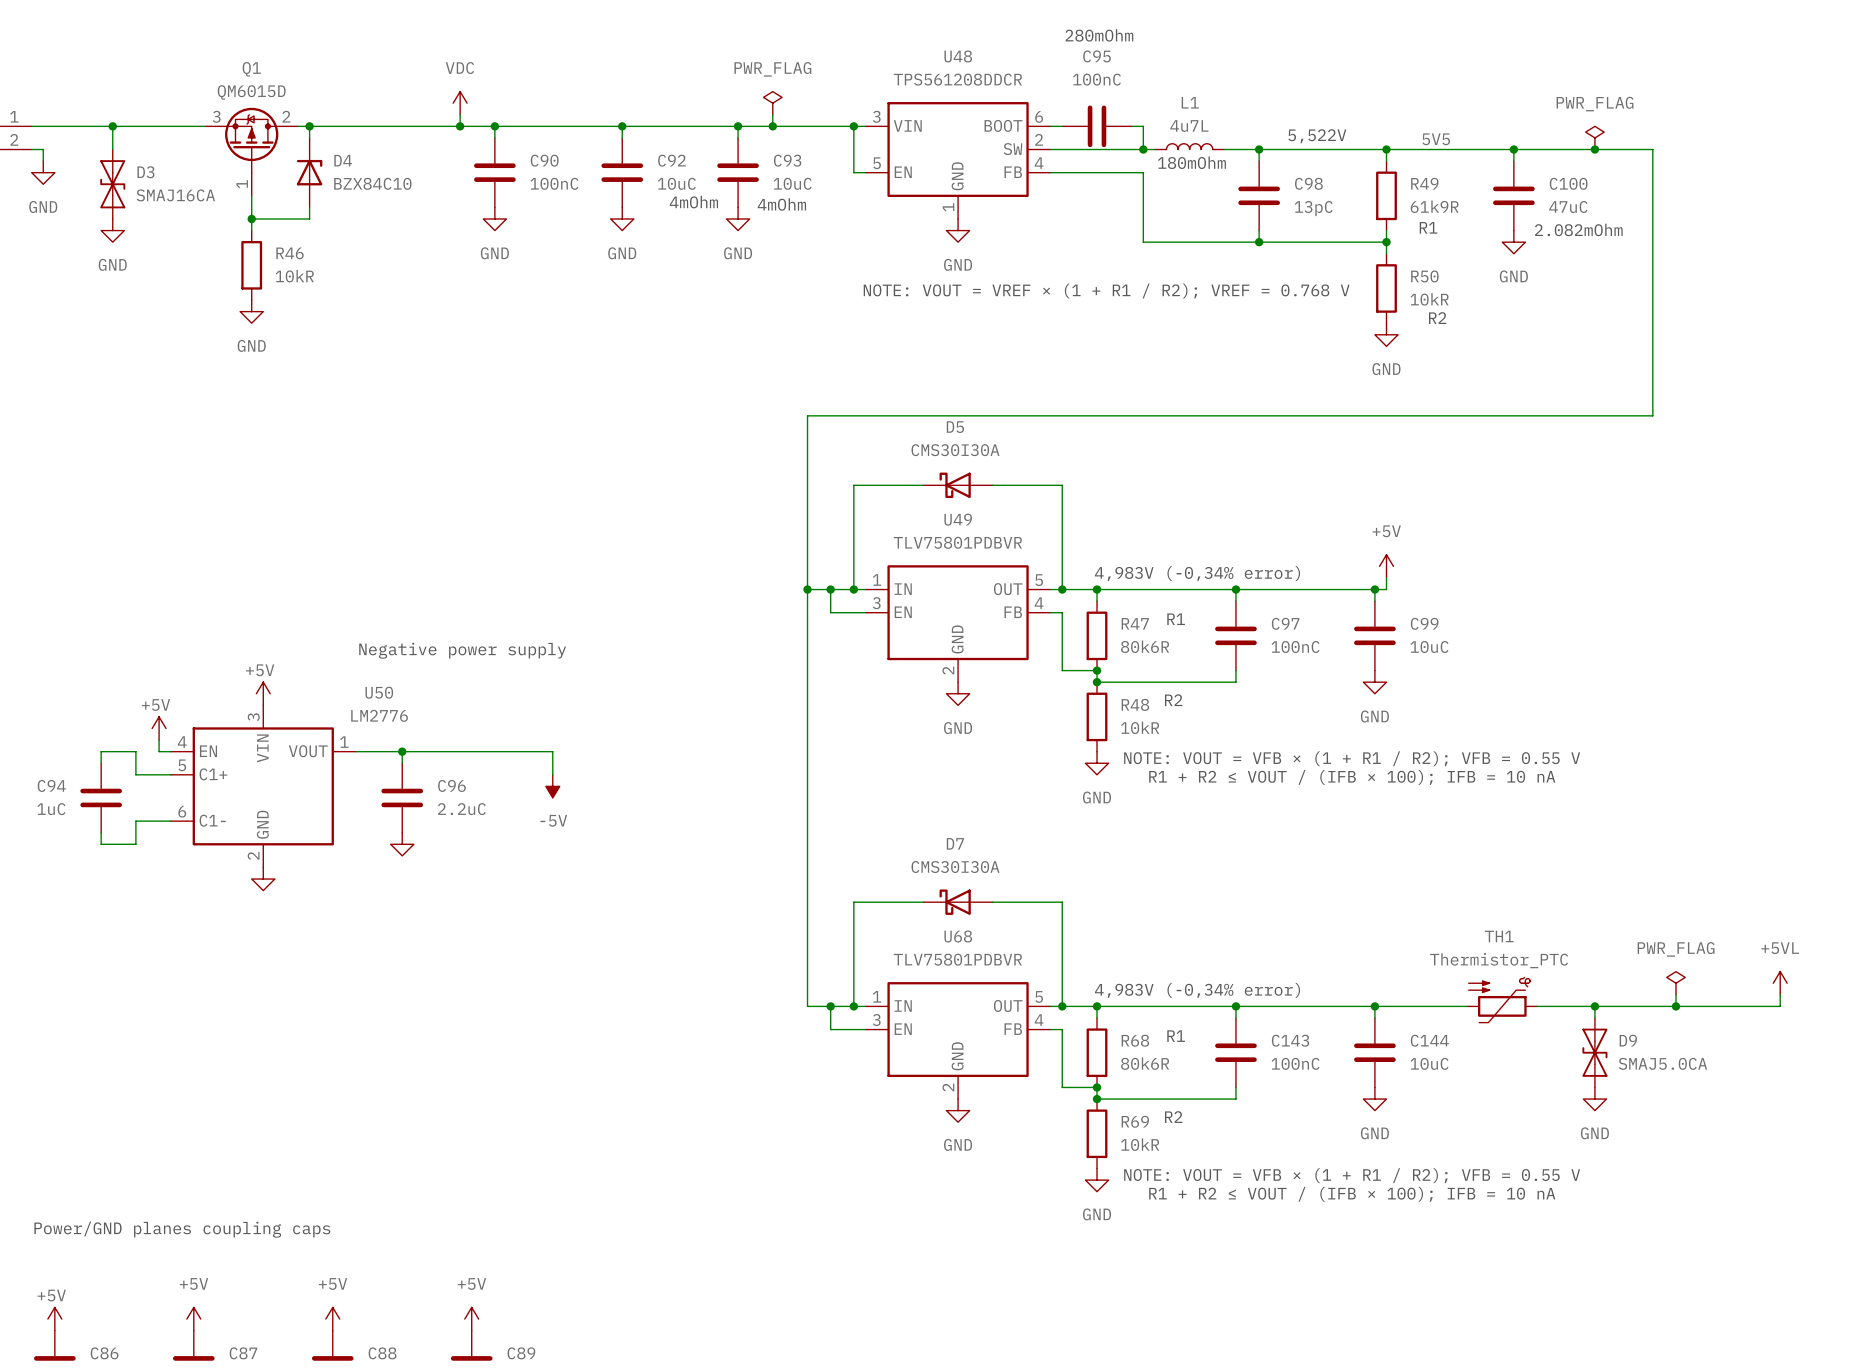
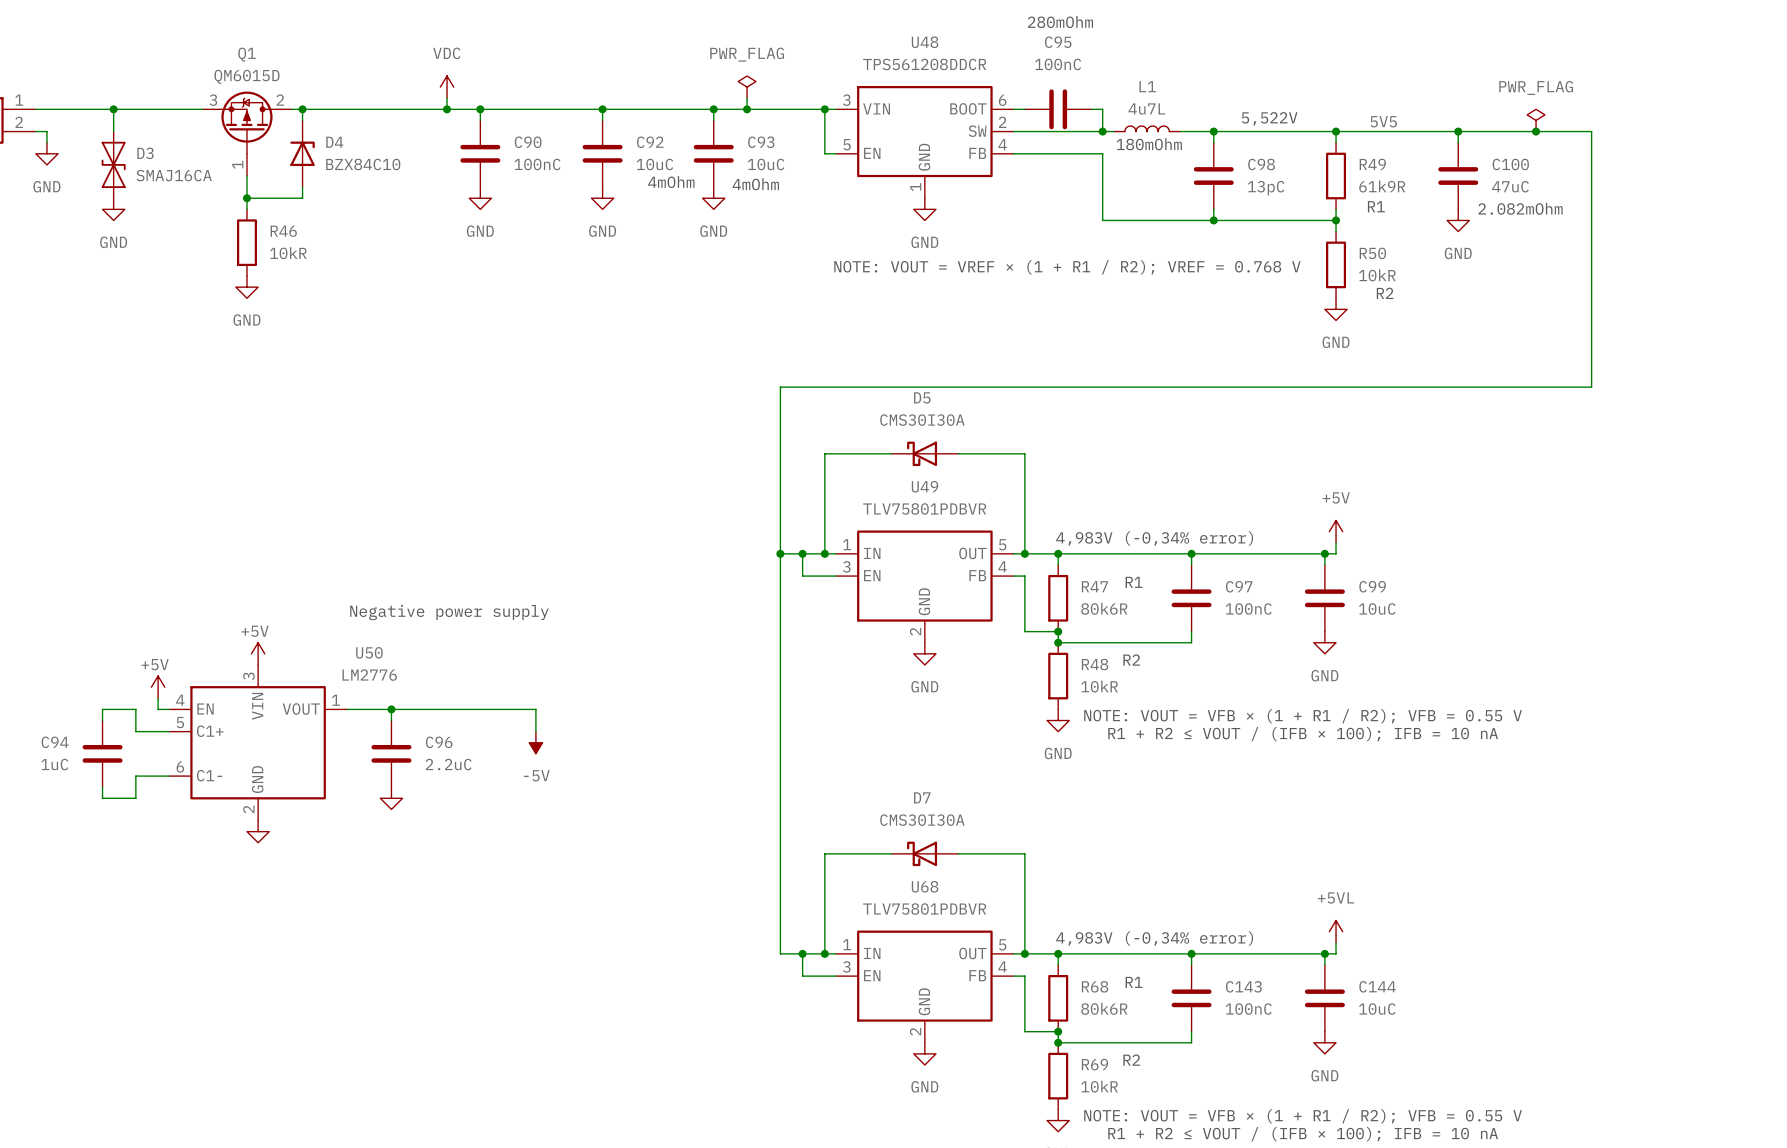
power symbol: none -> +5VL (1336, 931)
power symbol: PWR_FLAG (1675, 983) -> none
power symbol: +5VL (1780, 983) -> none
wire: (1675, 994) (1675, 1006) -> none
wire: (1780, 994) (1780, 1006) (1537, 1006) -> none
TH1: Thermistor_PTC (1502, 1000) -> none
wire: (1386, 1006) (1467, 1006) -> (1336, 953) (1336, 942)
wire: (1594, 1006) (1594, 1017) -> none
junction: (1594, 1006) -> none
junction: (1675, 1006) -> none
D9: SMAJ5.0CA (1594, 1052) -> none
power symbol: GND (1594, 1099) -> none

